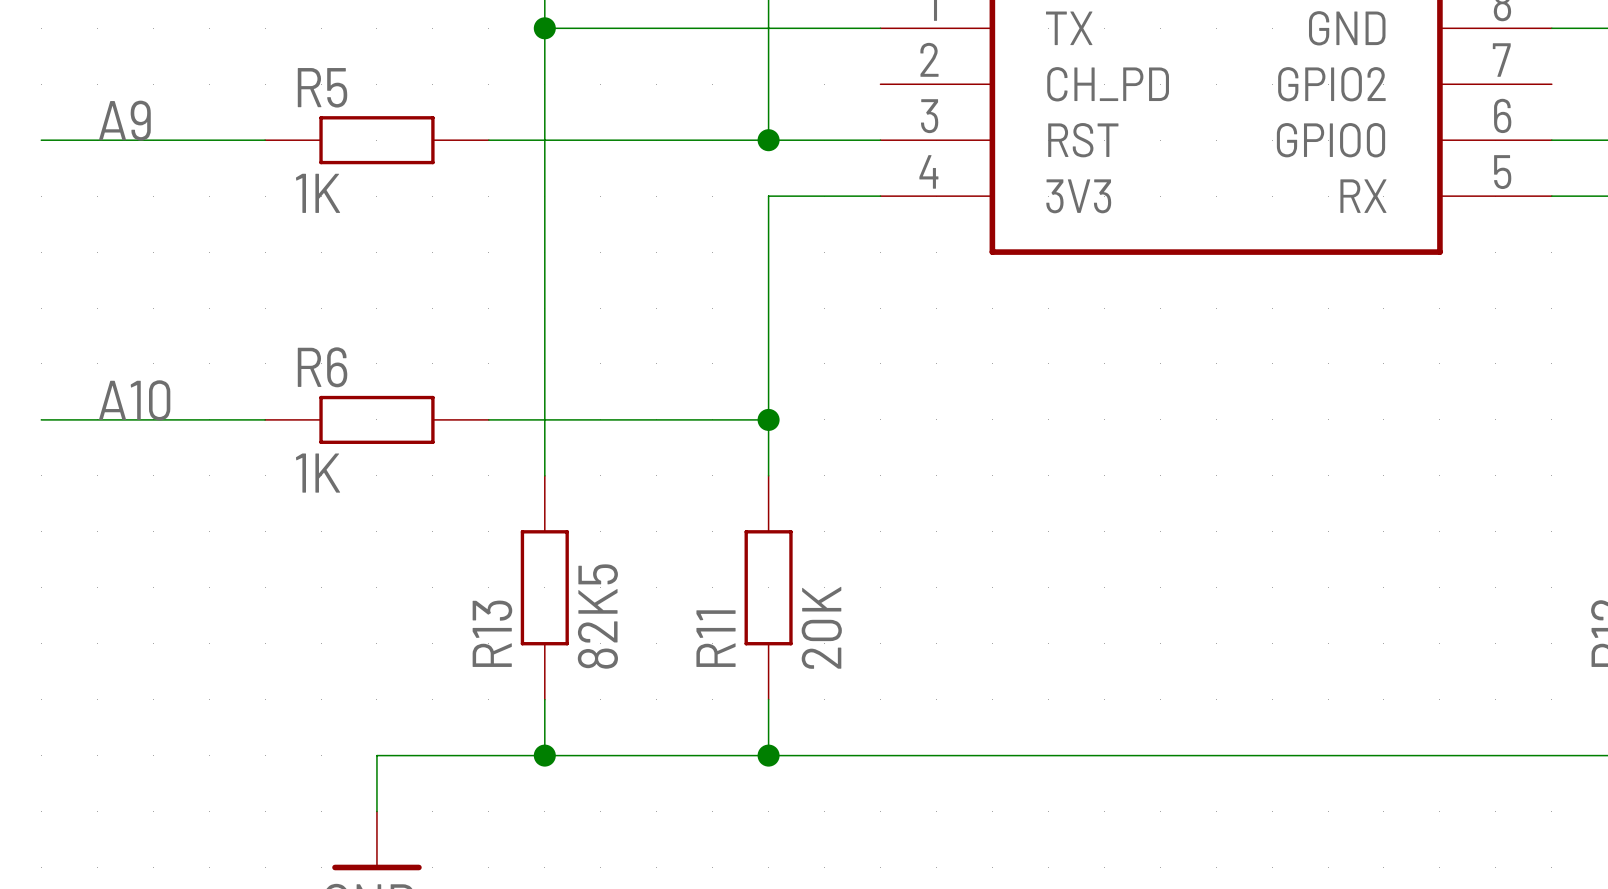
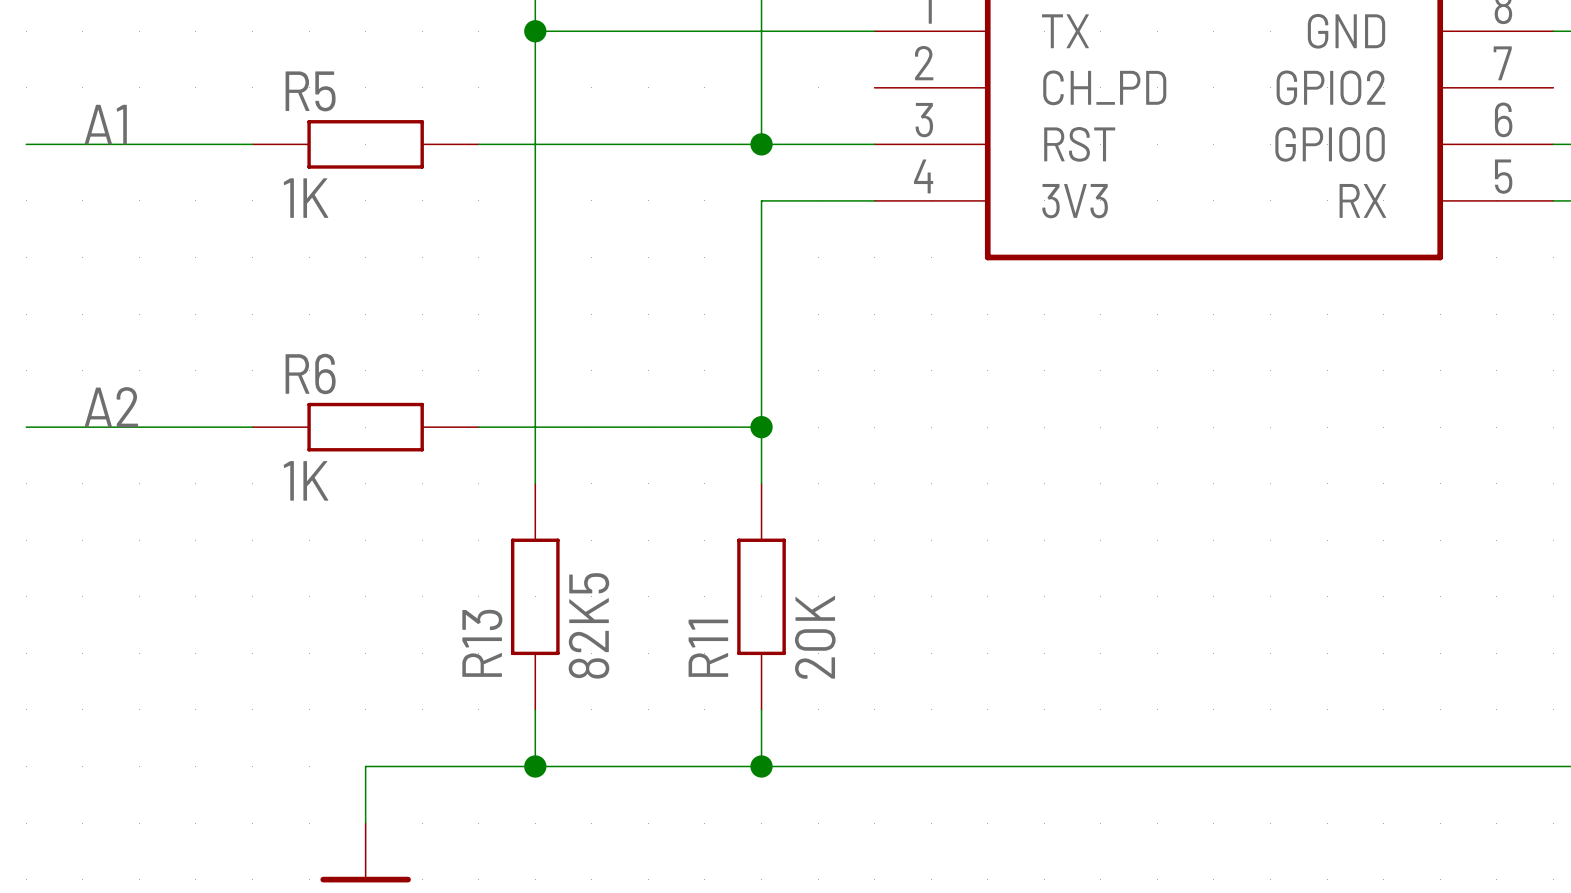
label: A9 (124, 120) -> A1 (105, 124)
label: A10 (134, 400) -> A2 (111, 407)

